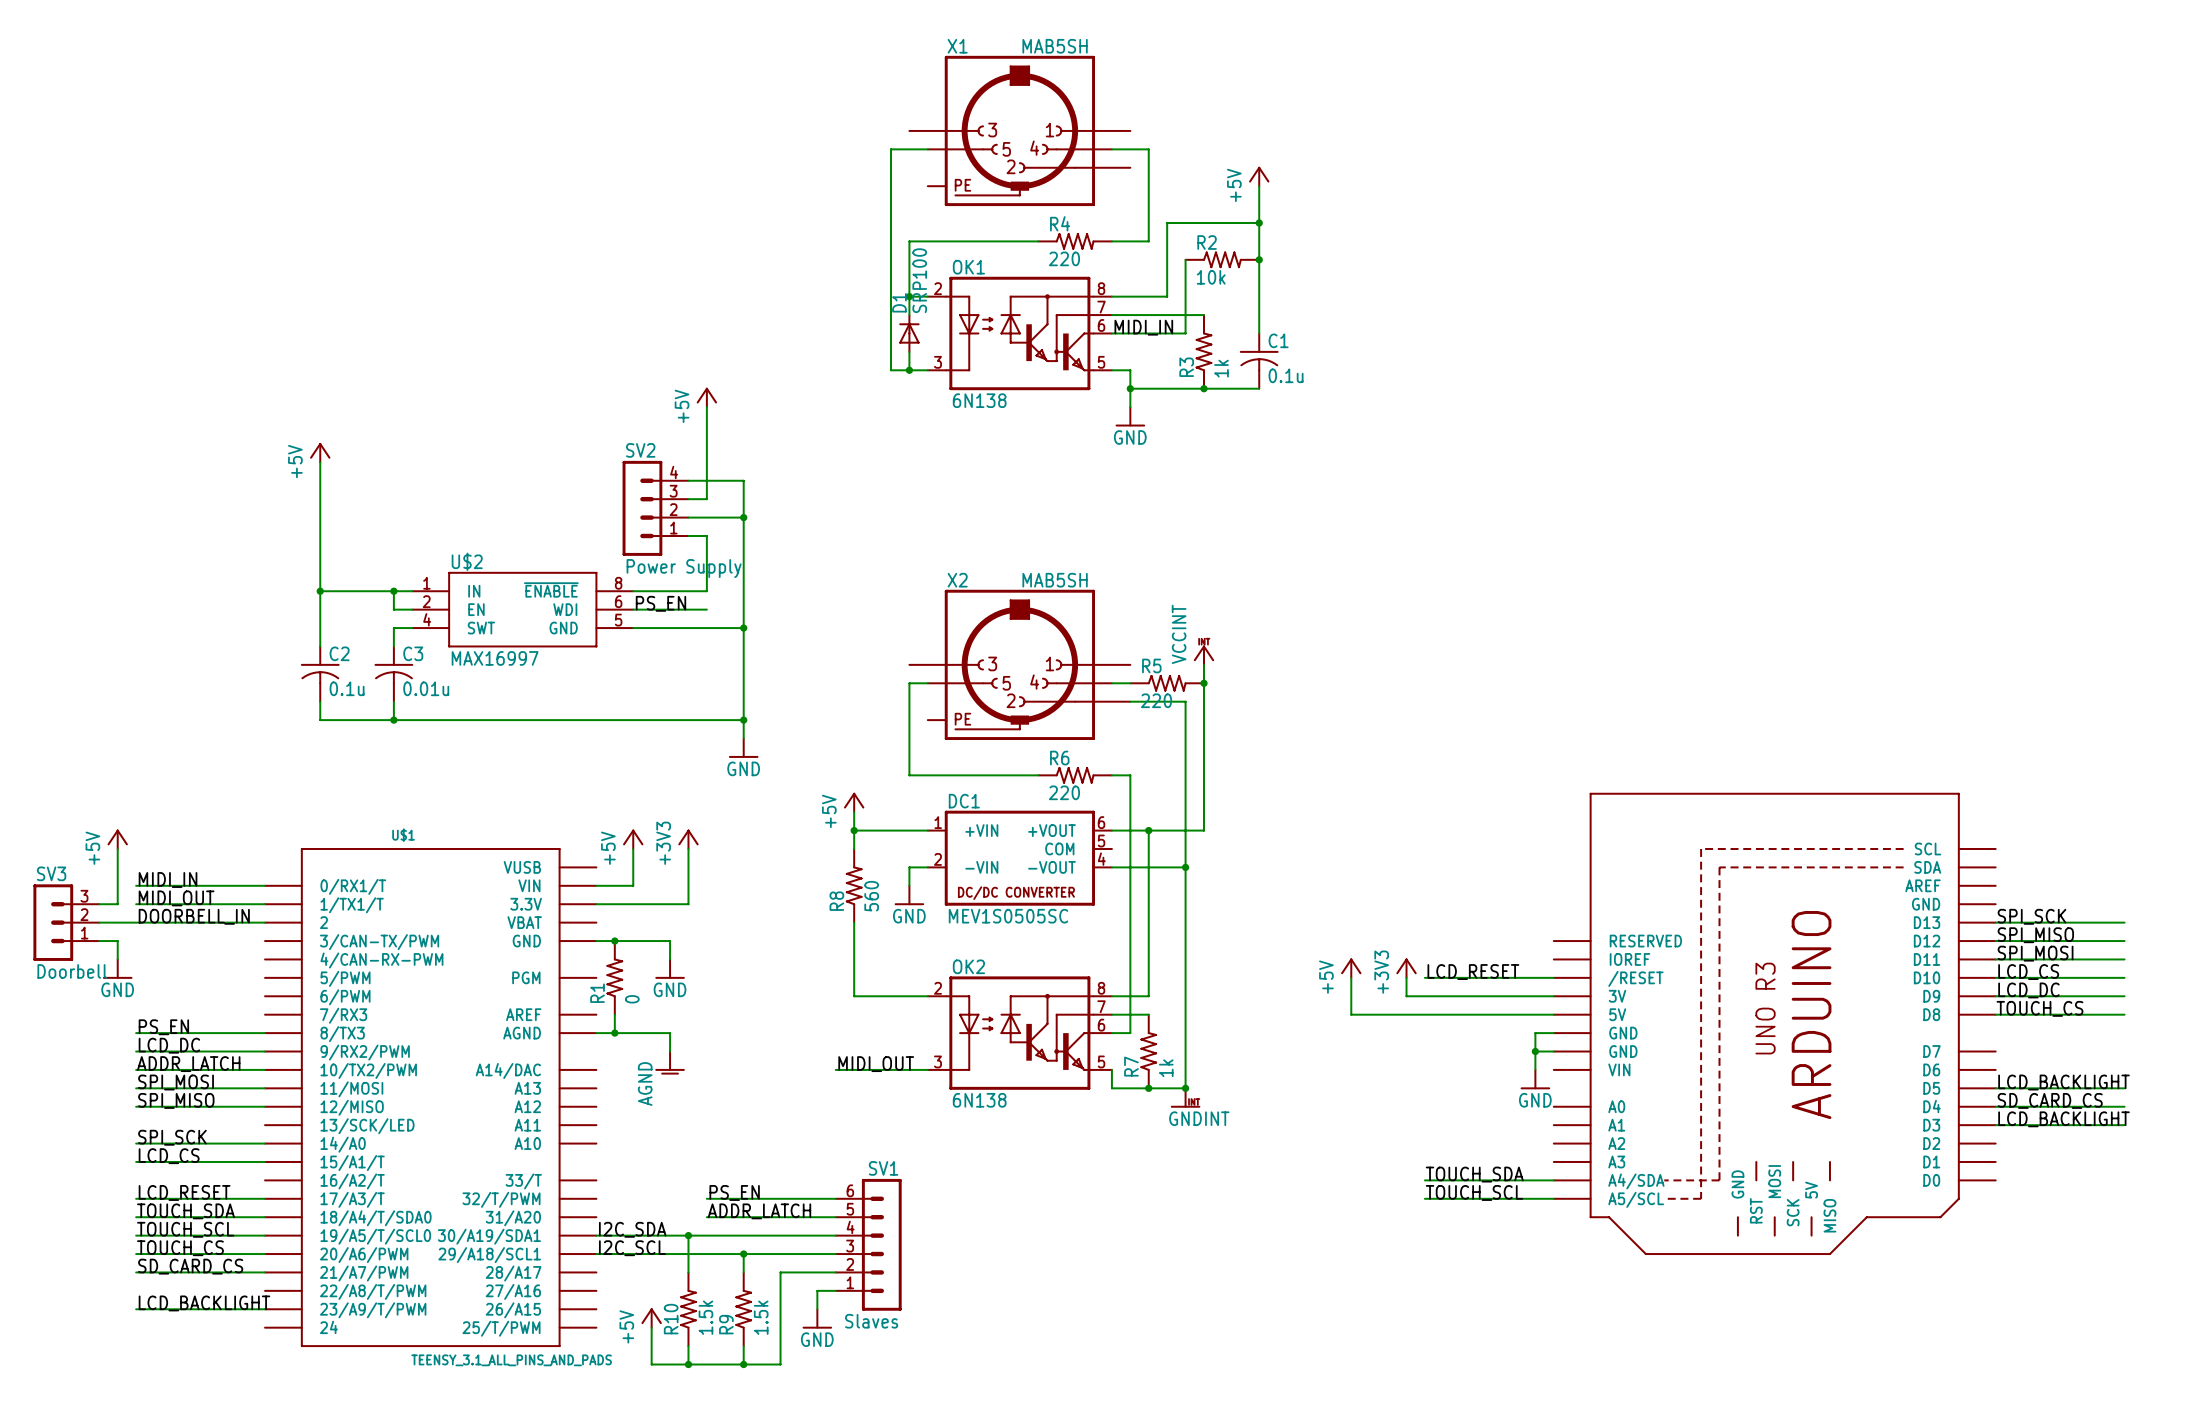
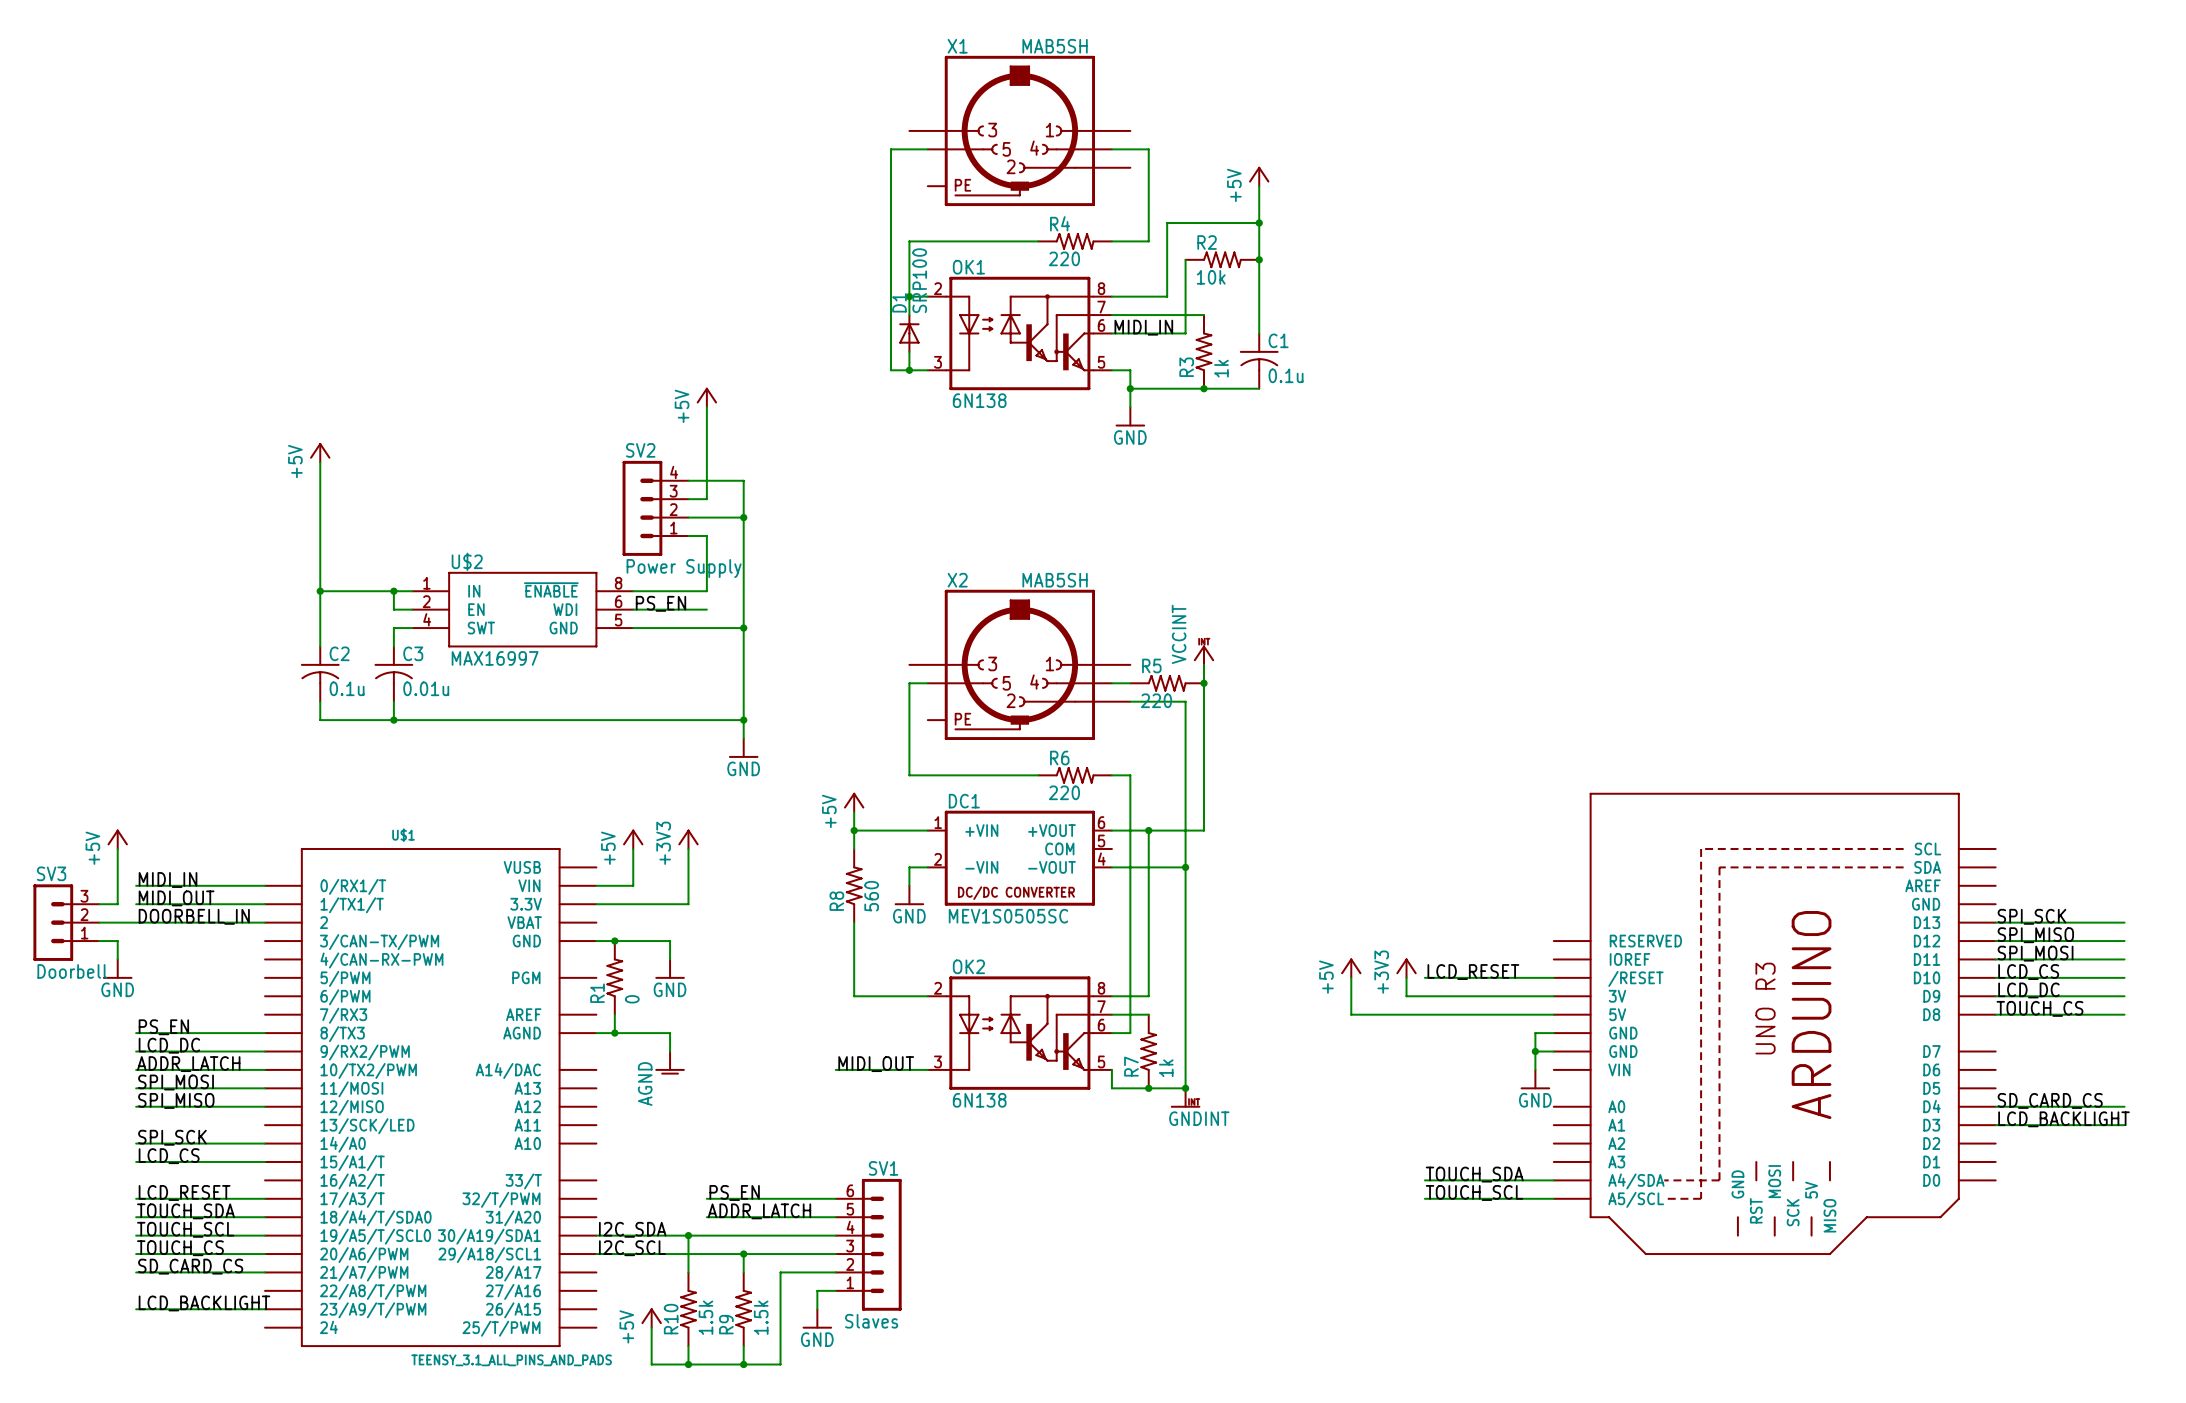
label: LCD_BACKLIGHT (2064, 1082) -> none
wire: (1995, 1088) (2124, 1088) -> none

